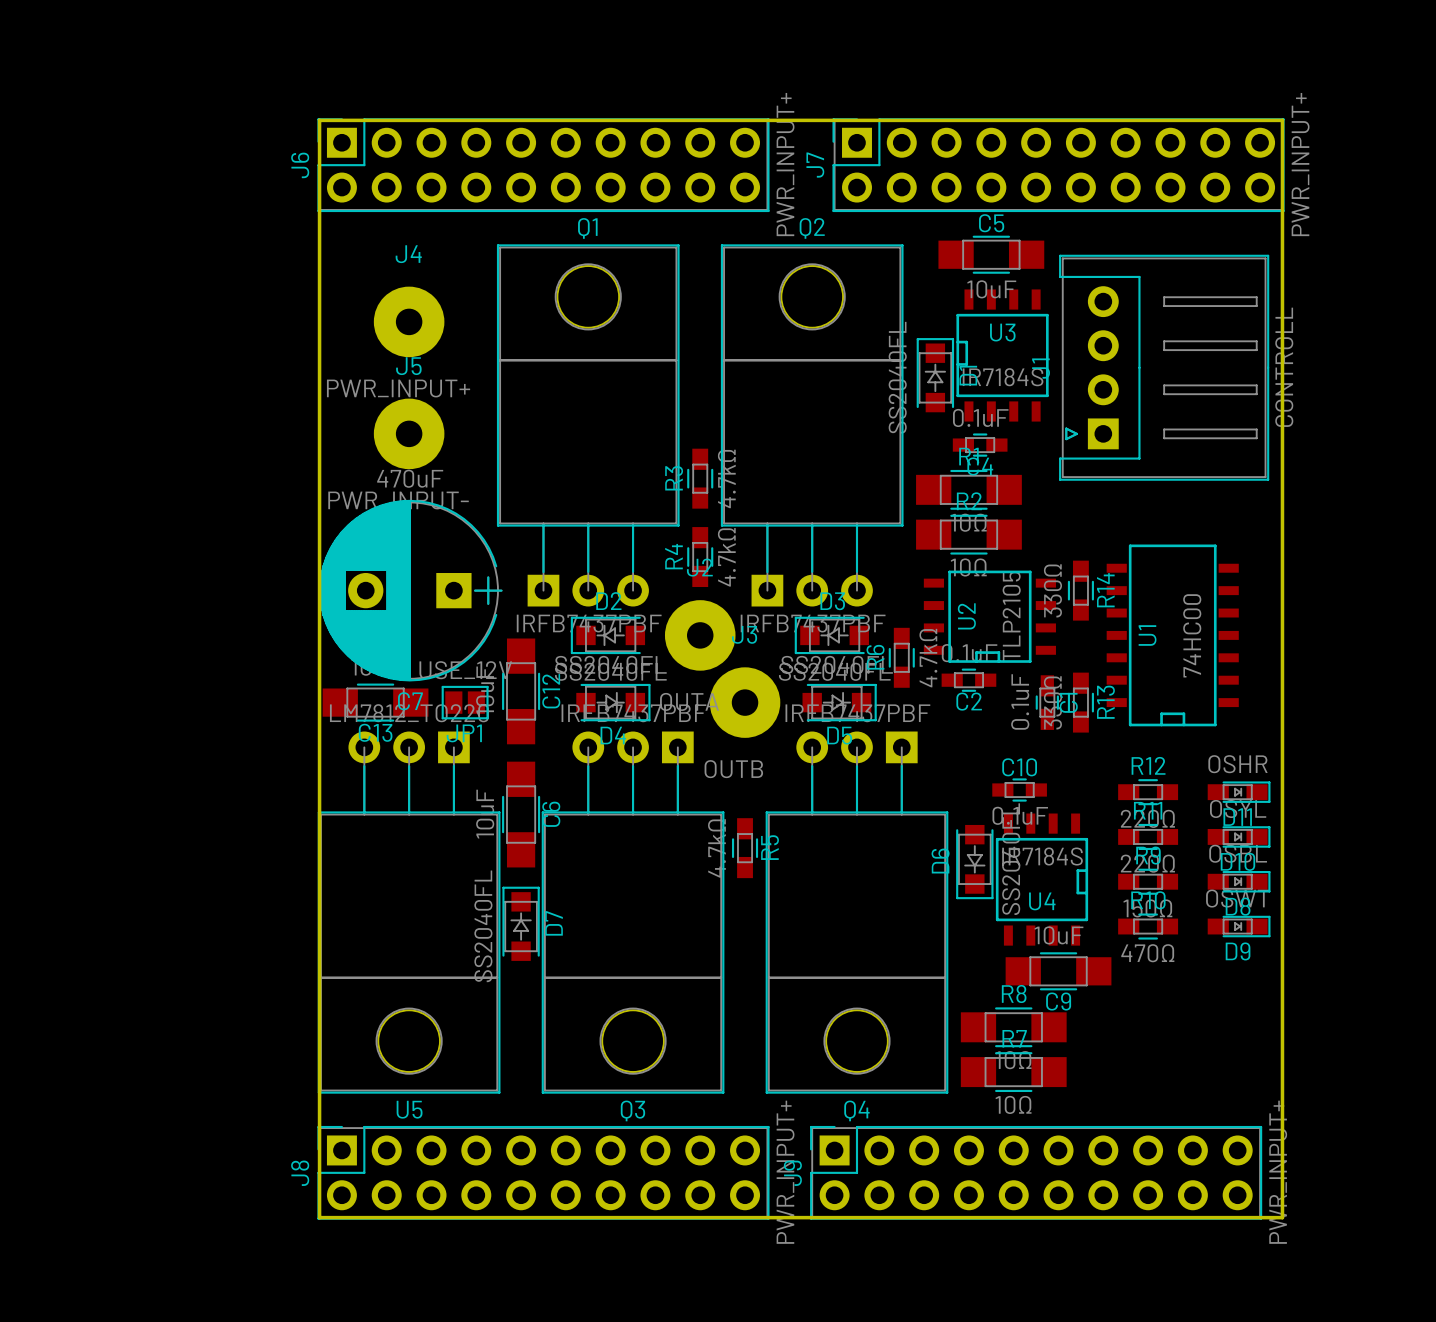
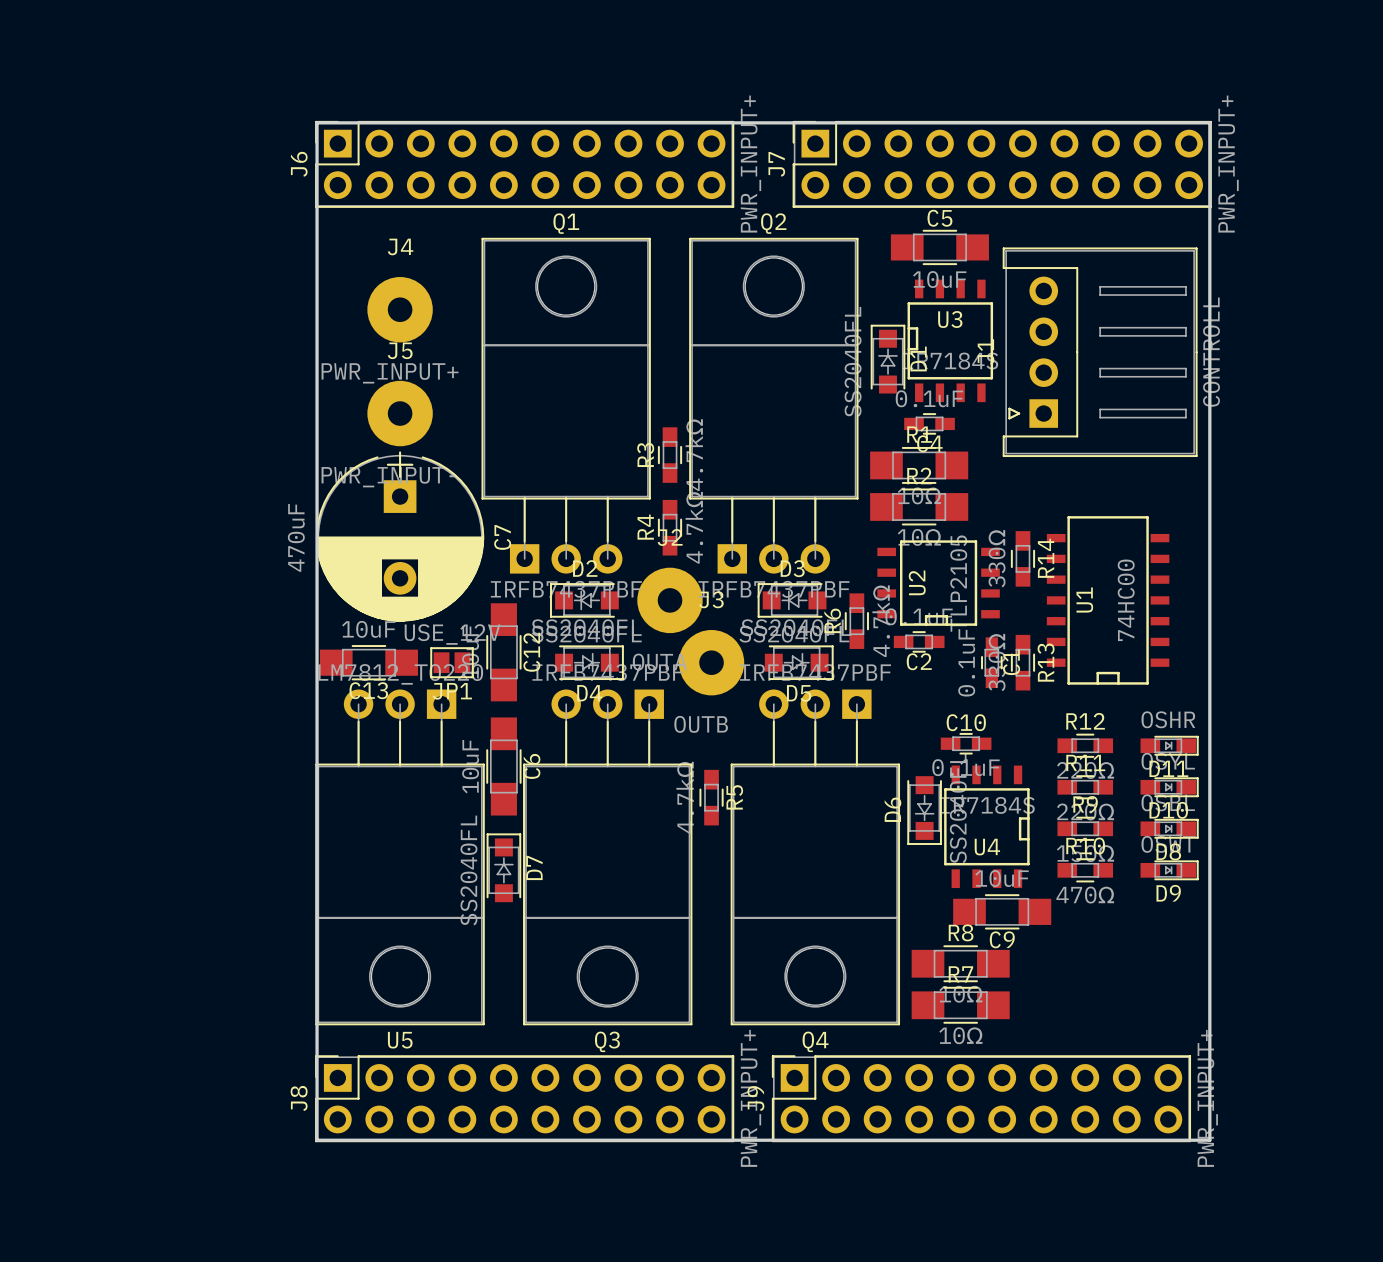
C7 rotation: 0° (410, 590) -> 90° counterclockwise (400, 536)

